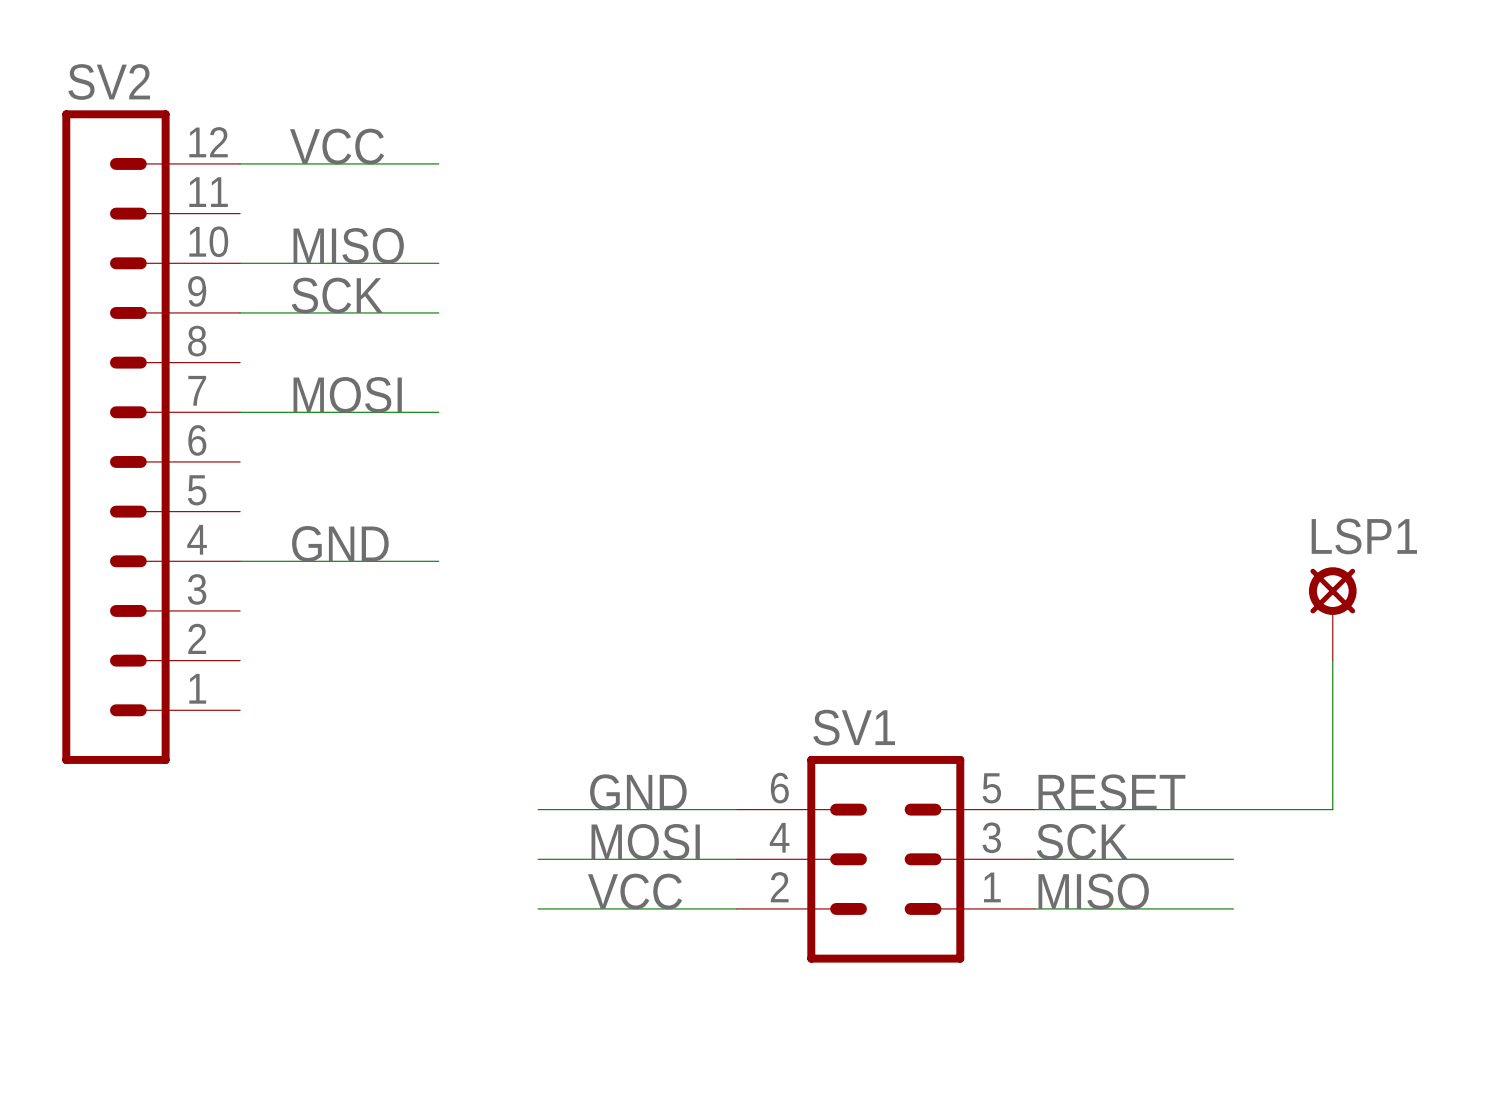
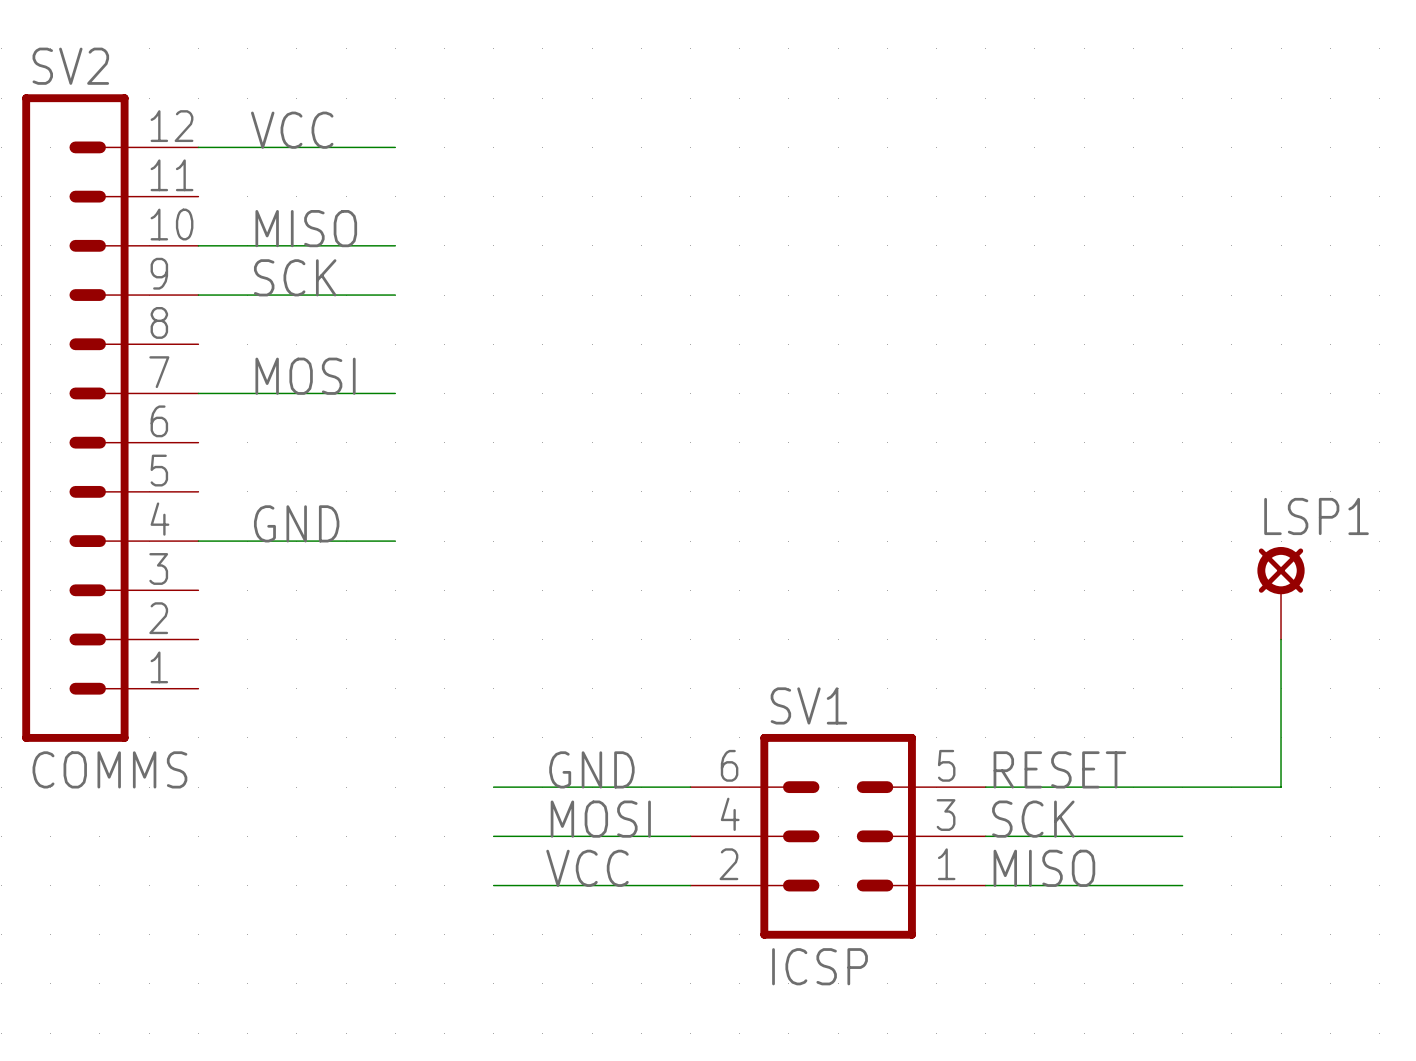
SV2 value: none -> COMMS (109, 769)
SV1 value: none -> ICSP (820, 966)

